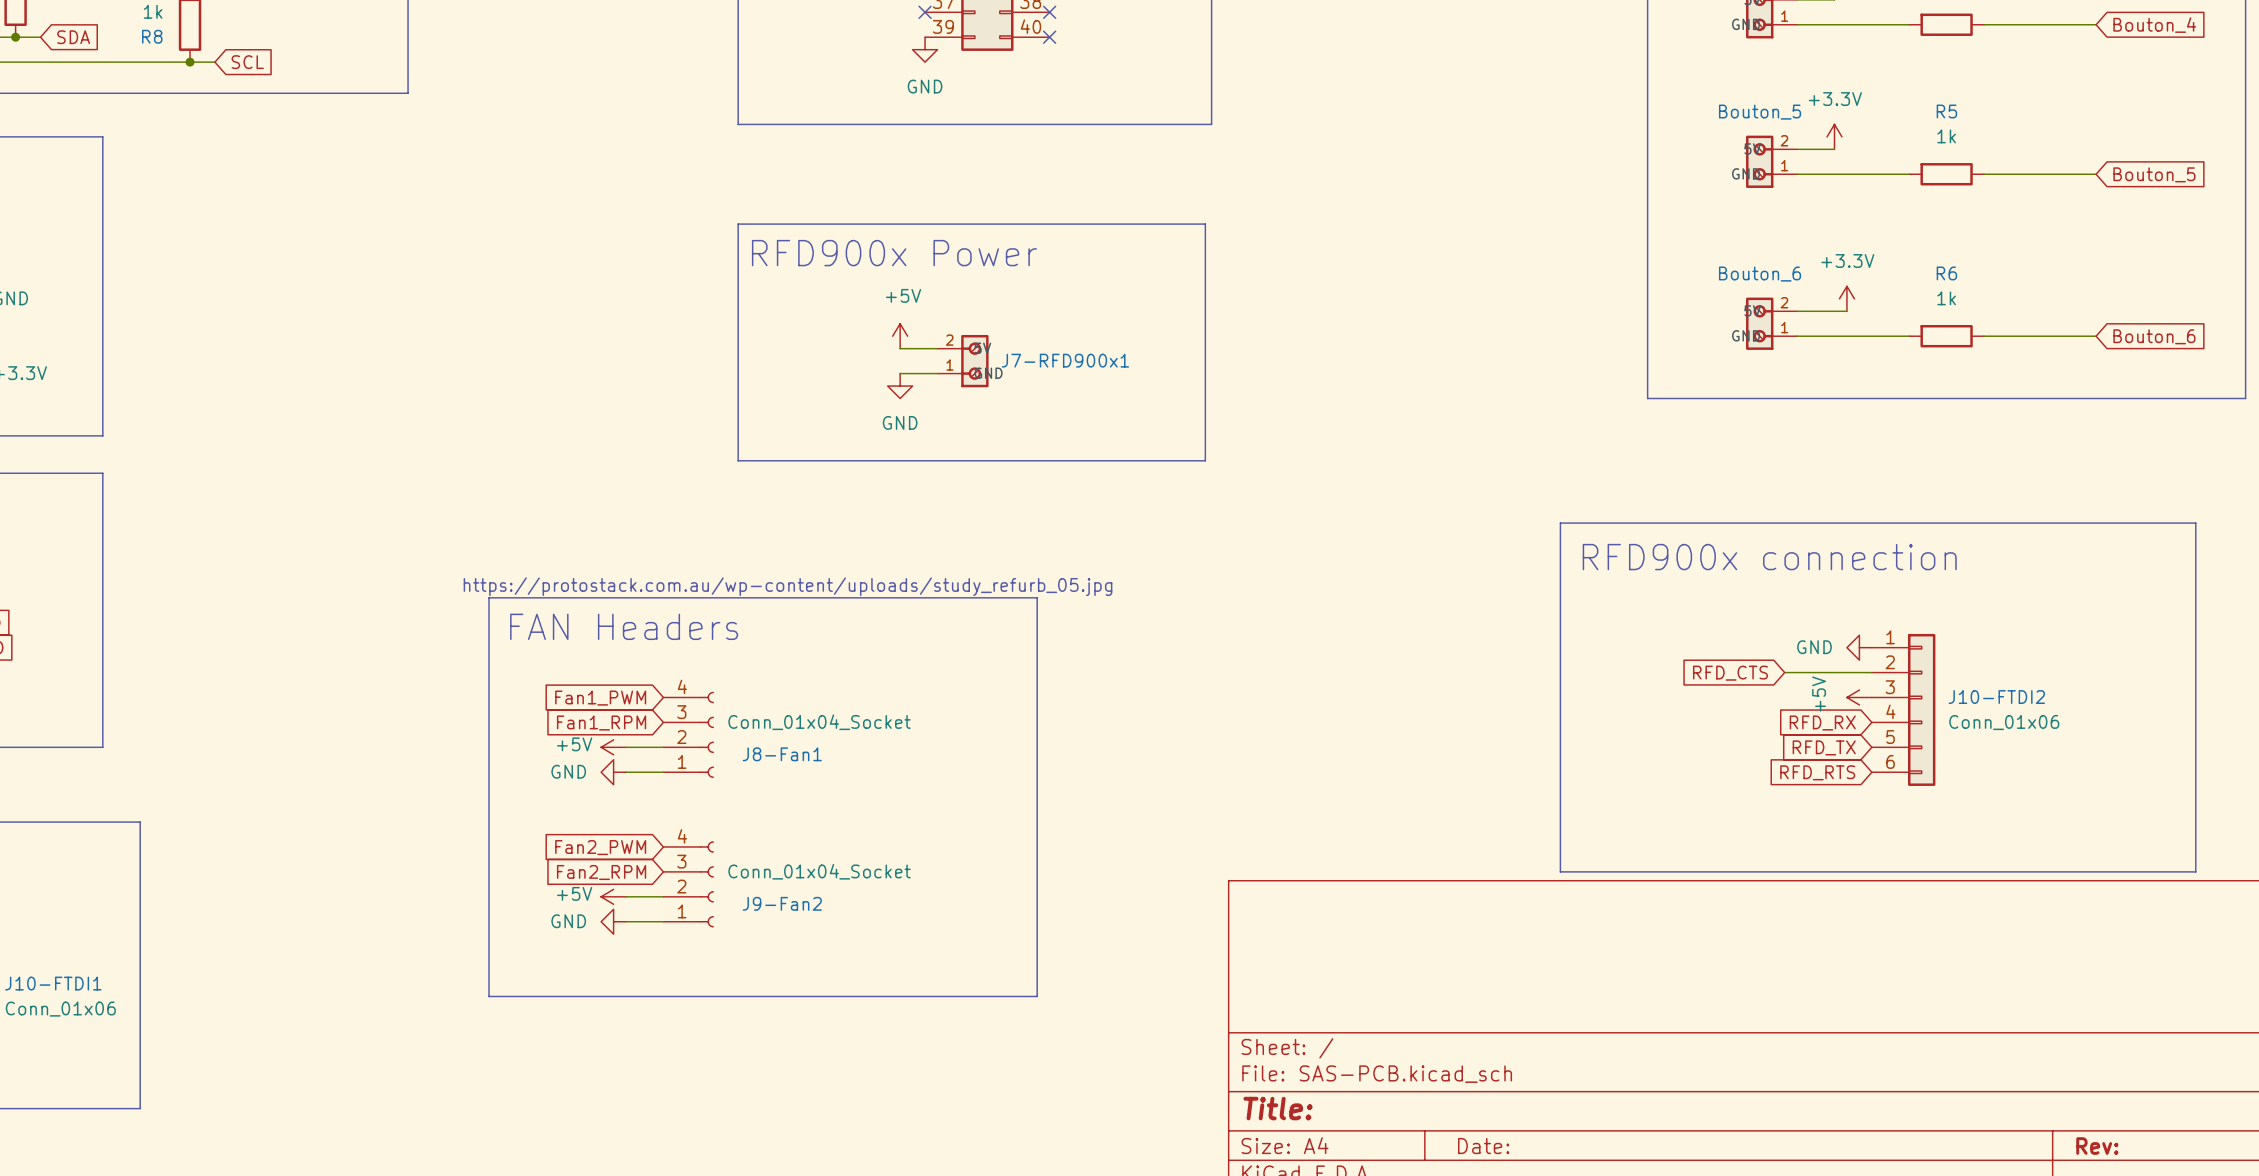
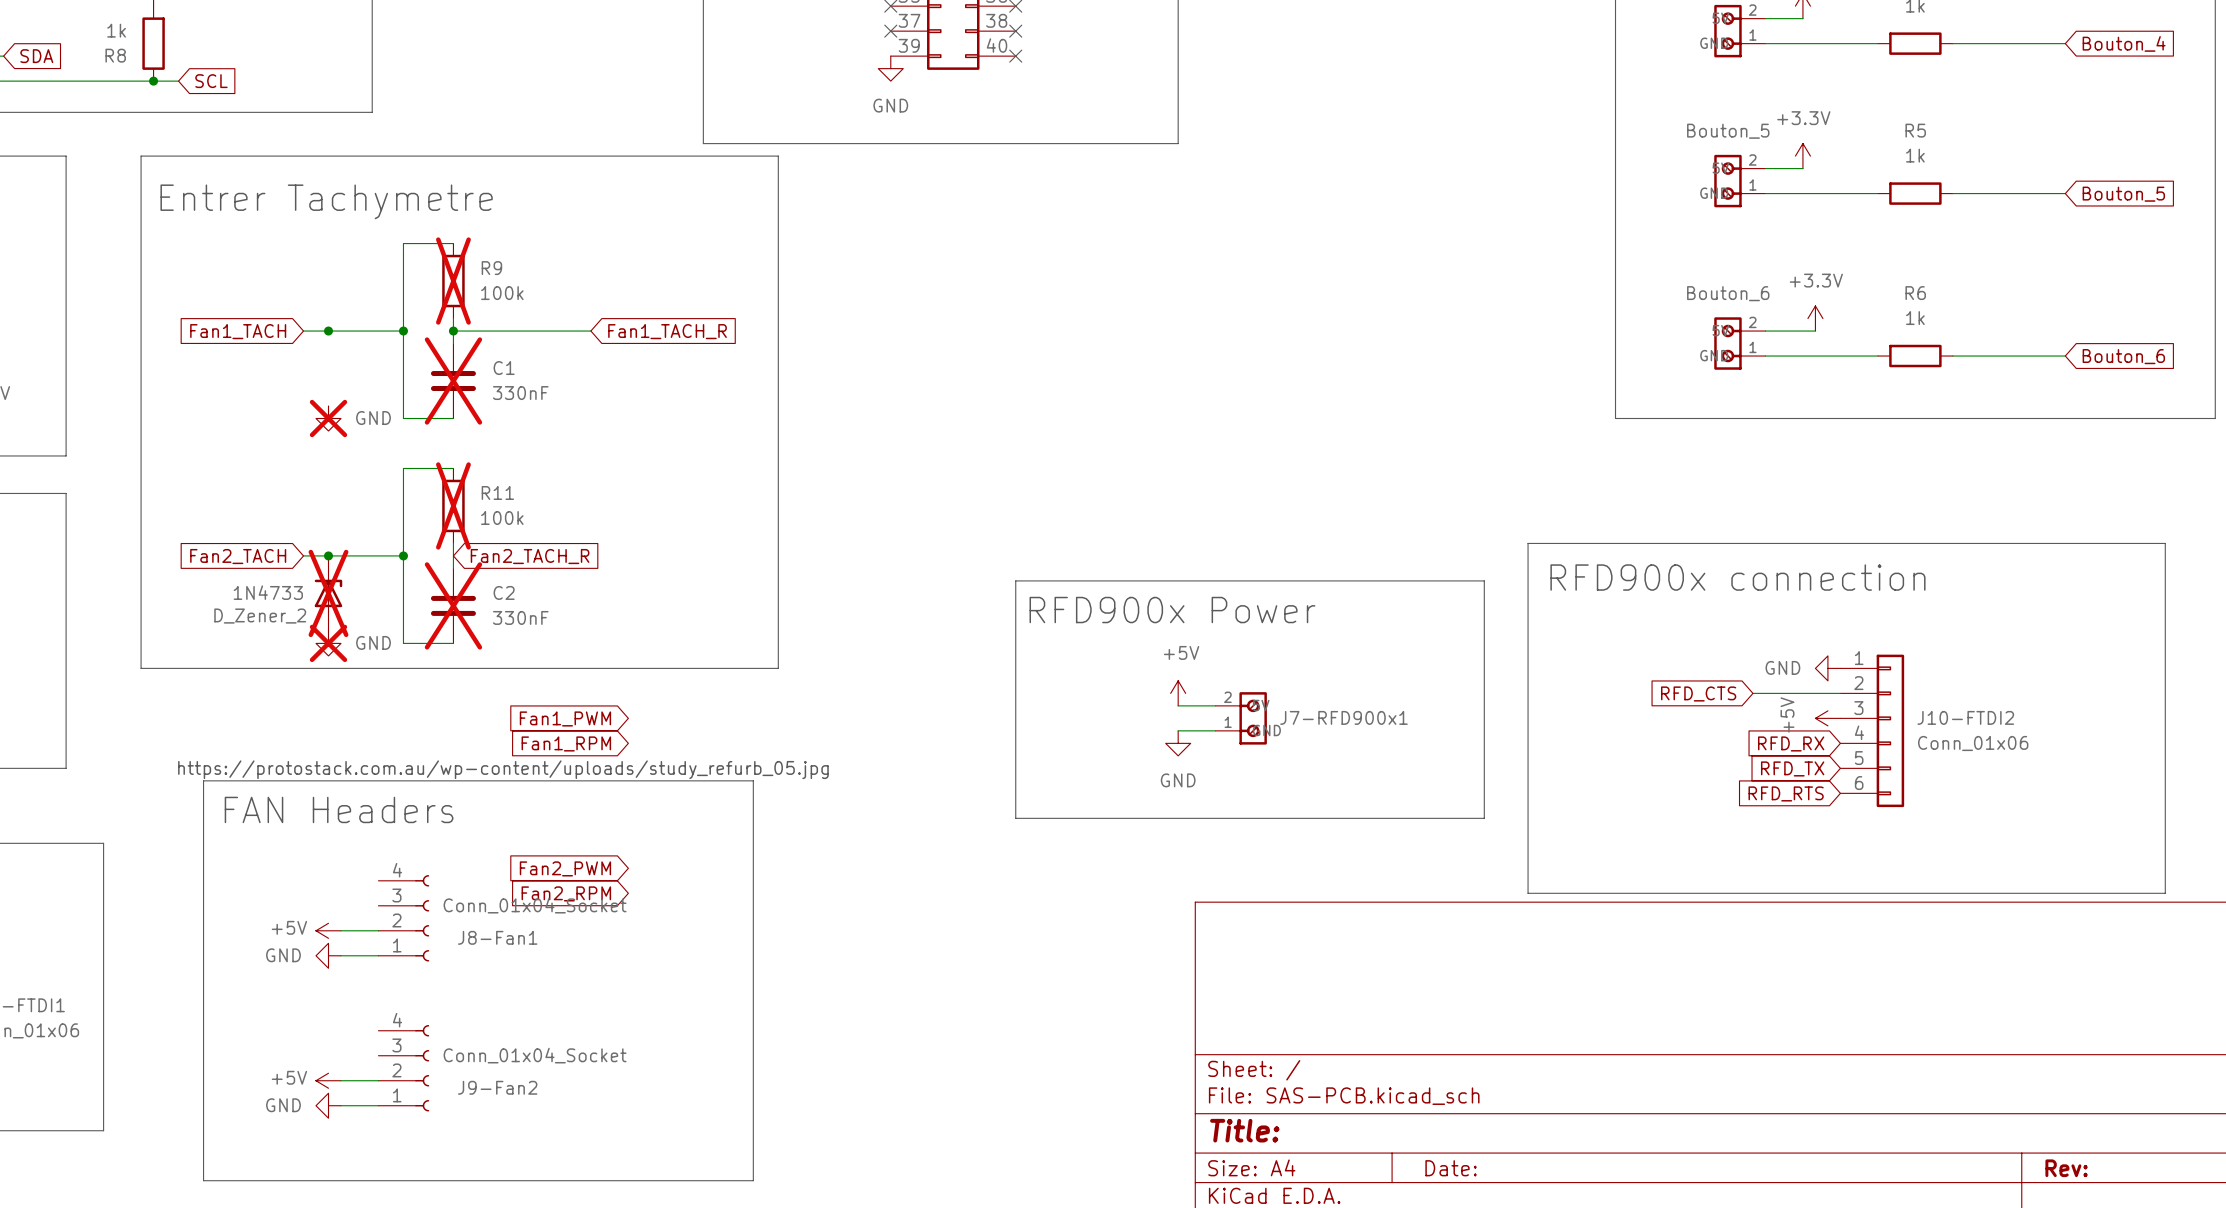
line: none -> (141, 156) (778, 156) (778, 668) (141, 668) (141, 156)
text: none -> Entrer Tachymetre (326, 201)
wire: none -> (453, 243) (403, 243) (403, 418) (453, 418)
line: (738, 224) (1205, 224) (1205, 460) (738, 460) (738, 224) -> none
text: RFD900x Power (894, 253) -> none
R9: none -> 100k (453, 281)
wire: none -> (453, 318) (453, 343)
global label: none -> Fan1_TACH (238, 331)
wire: none -> (303, 331) (403, 331)
junction: none -> (328, 331)
junction: none -> (403, 331)
wire: none -> (453, 331) (590, 331)
junction: none -> (453, 331)
global label: none -> Fan1_TACH_R (667, 331)
power symbol: +5V (900, 336) -> none
wire: (900, 348) (937, 348) -> none
C1: none -> 330nF (453, 381)
J7-RFD900x1 position: (963, 361) -> (1241, 718)
wire: (900, 373) (937, 373) -> none
power symbol: GND (900, 386) -> none
power symbol: none -> GND (328, 418)
wire: none -> (453, 468) (403, 468) (403, 643) (453, 643)
R11: none -> 100k (453, 505)
wire: none -> (453, 543) (453, 568)
wire: none -> (303, 555) (403, 555)
junction: none -> (328, 555)
junction: none -> (403, 555)
global label: none -> Fan2_TACH (238, 556)
global label: none -> Fan2_TACH_R (530, 556)
line: none -> (1015, 580) (1484, 580) (1484, 818) (1015, 818) (1015, 580)
D_Zener_2: none -> 1N4733 (328, 593)
C2: none -> 330nF (453, 605)
text: https://protostack.com.au/wp-content/uploads/study_refurb_05.jpg (788, 586) -> none
text: none -> RFD900x Power (1172, 610)
line: (489, 597) (1037, 597) (1037, 996) (489, 996) (489, 597) -> none
power symbol: none -> GND (328, 643)
text: FAN Headers (624, 626) -> none
power symbol: none -> +5V (1178, 693)
wire: none -> (1178, 705) (1215, 705)
wire: none -> (1178, 730) (1215, 730)
power symbol: none -> GND (1178, 743)
J8-Fan1 position: (688, 734) -> (403, 918)
power symbol: +5V (613, 747) -> none
wire: (626, 747) (663, 747) -> none
text: none -> https://protostack.com.au/wp-content/uploads/study_refurb_05.jpg (503, 769)
line: none -> (203, 780) (753, 780) (753, 1180) (203, 1180) (203, 780)
power symbol: GND (613, 772) -> none
wire: (626, 772) (663, 772) -> none
text: none -> FAN Headers (339, 809)
J9-Fan2 position: (688, 884) -> (403, 1068)
power symbol: +5V (613, 896) -> none
wire: (626, 896) (663, 896) -> none
power symbol: none -> +5V (328, 930)
wire: none -> (340, 930) (378, 930)
power symbol: GND (613, 921) -> none
wire: (626, 921) (663, 921) -> none
power symbol: none -> GND (328, 955)
wire: none -> (340, 955) (378, 955)
power symbol: none -> +5V (328, 1080)
wire: none -> (340, 1080) (378, 1080)
power symbol: none -> GND (328, 1105)
wire: none -> (340, 1105) (378, 1105)

